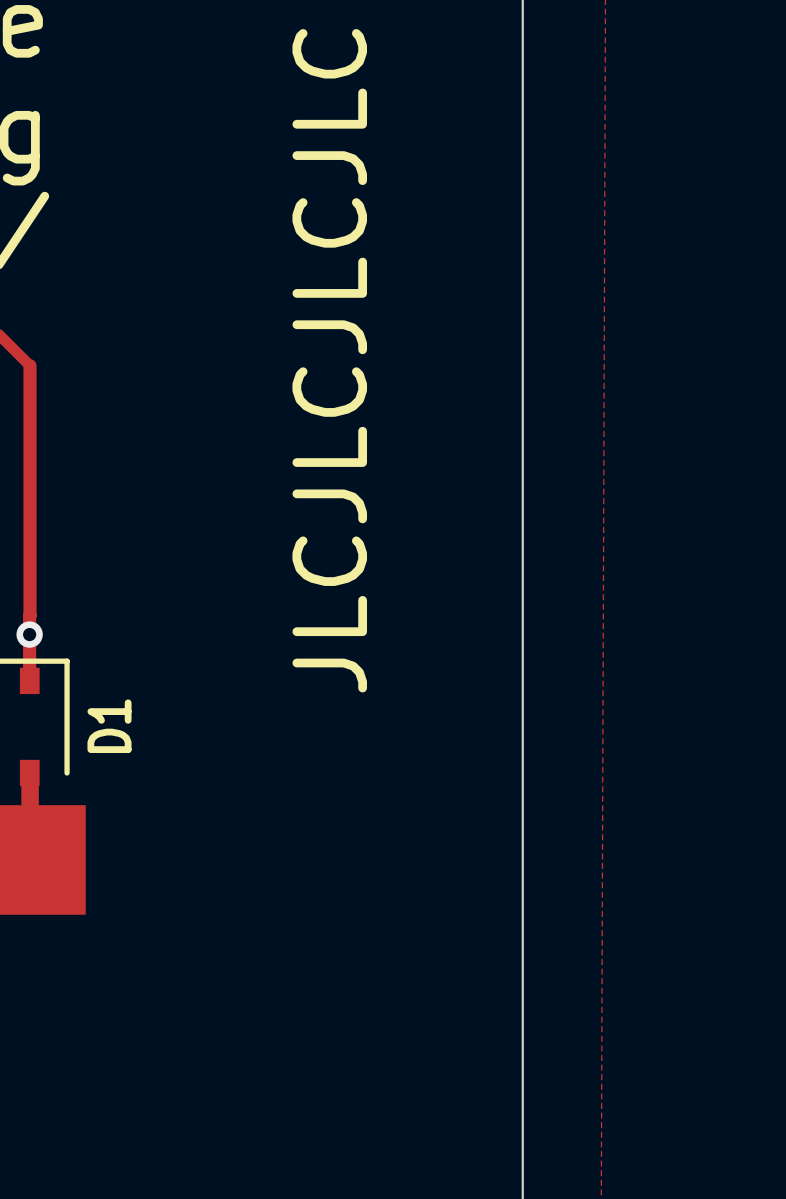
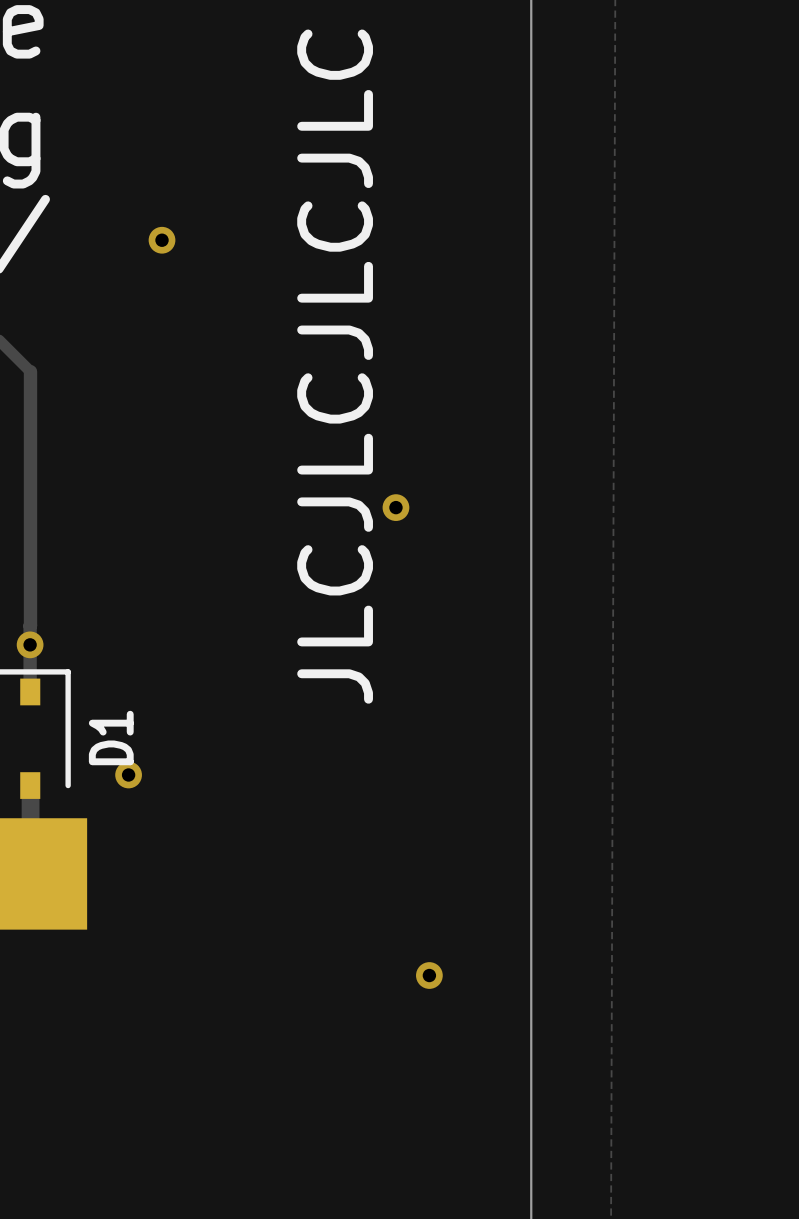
via: none -> (162, 240)
via: none -> (395, 507)
via: none -> (128, 774)
via: none -> (429, 975)

